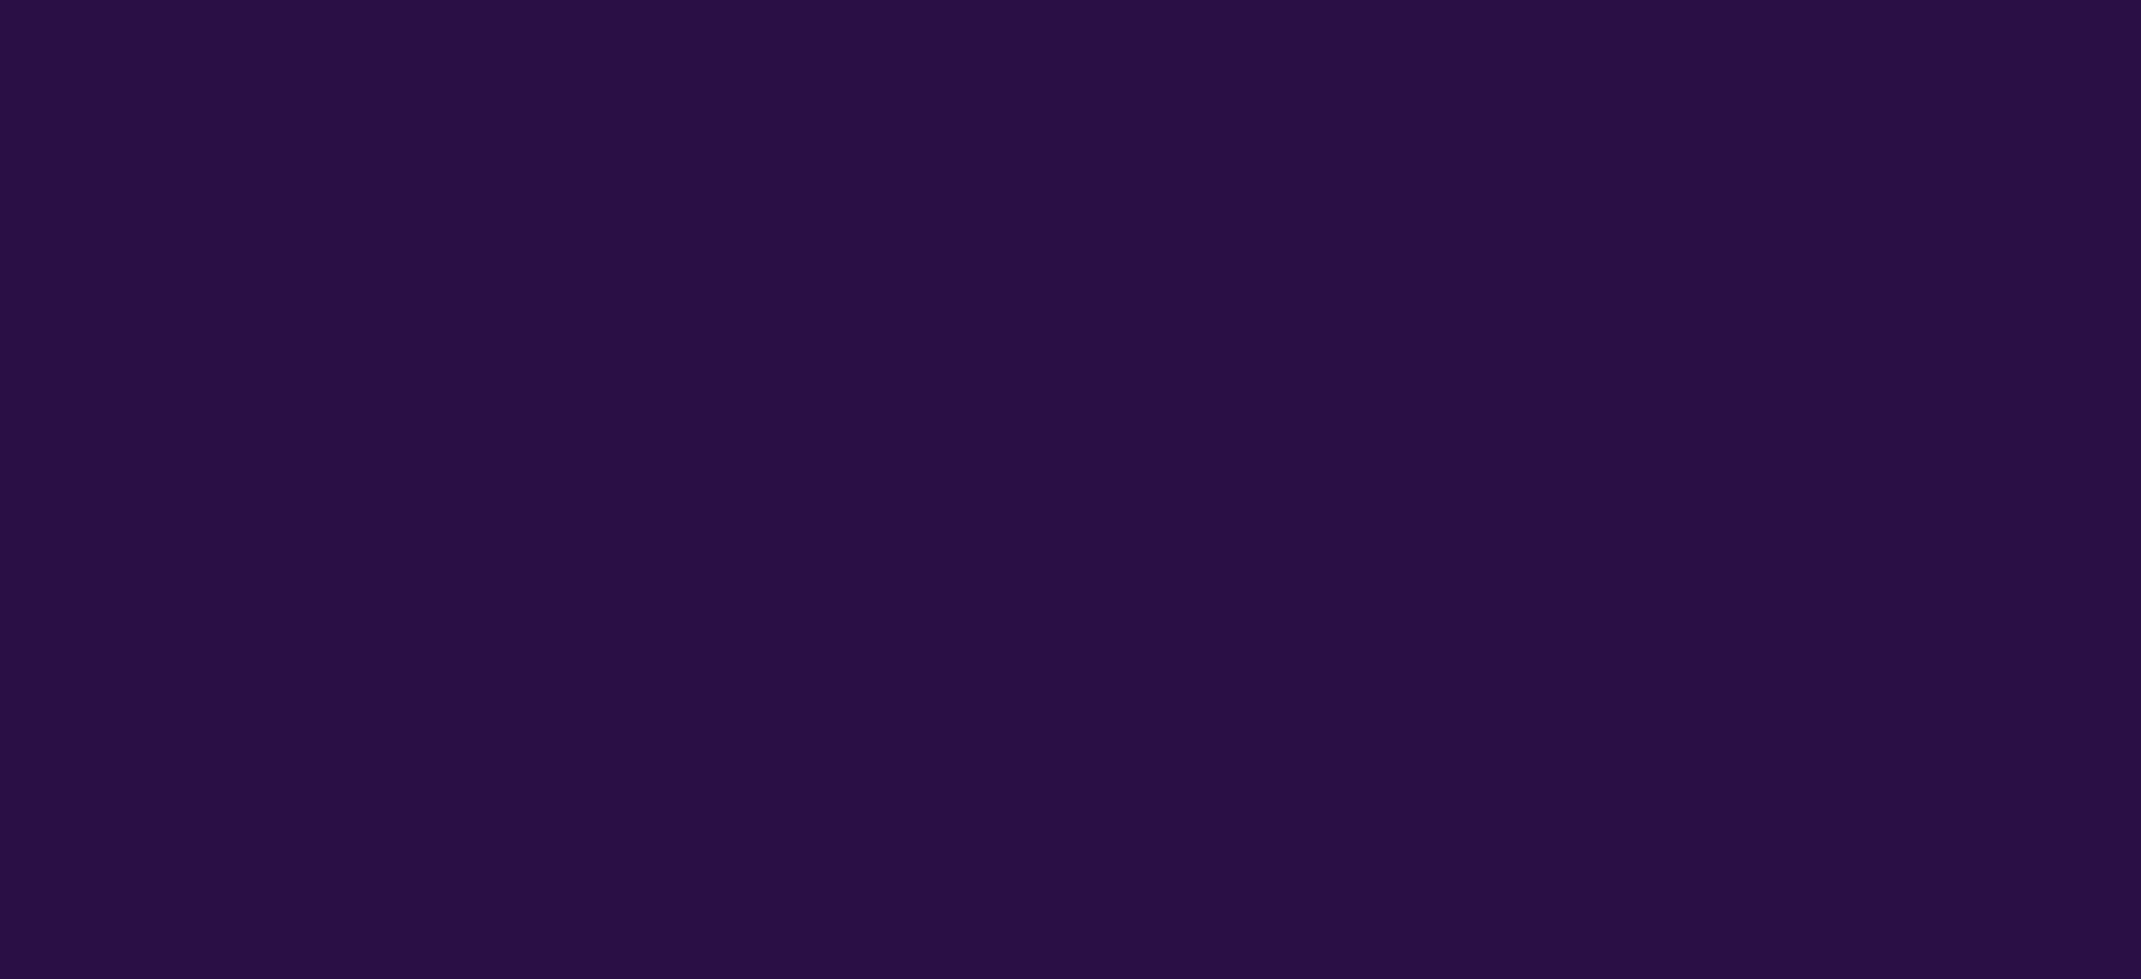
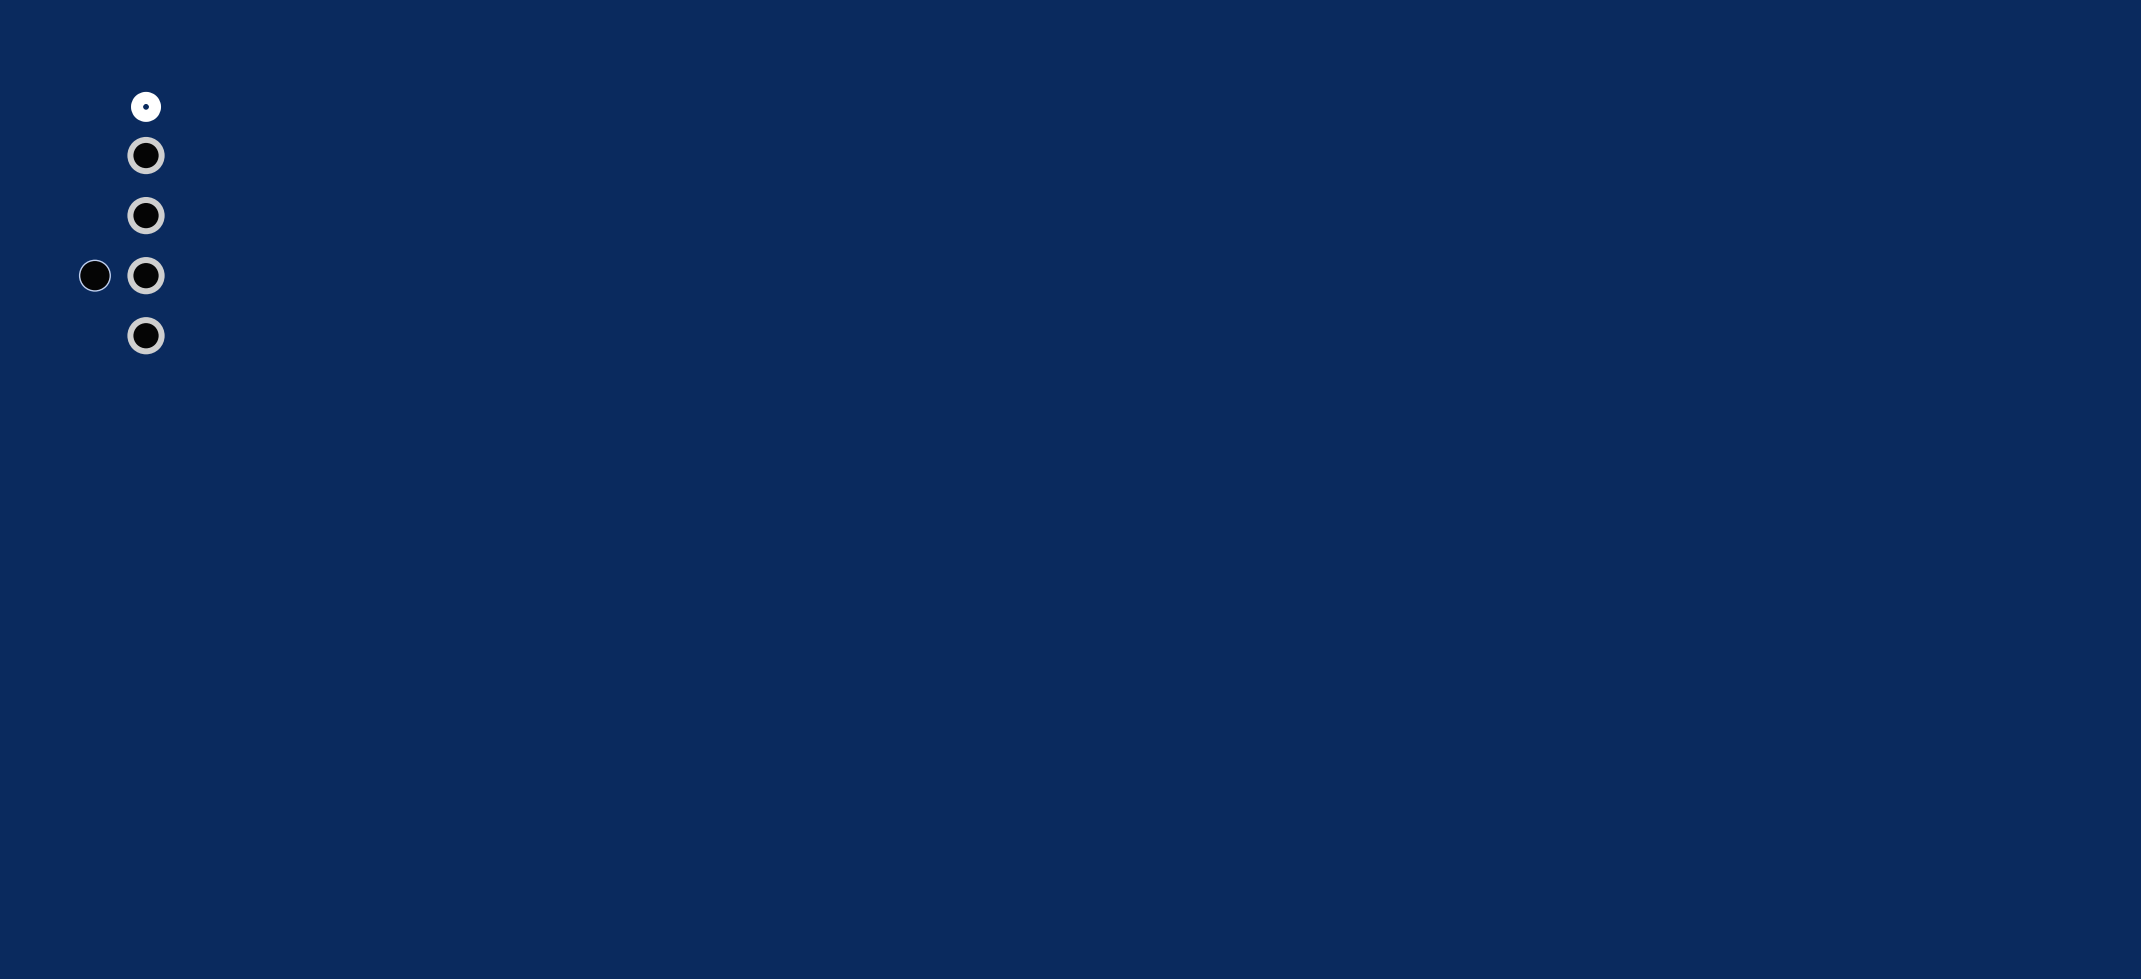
part: none -> (122, 223)

